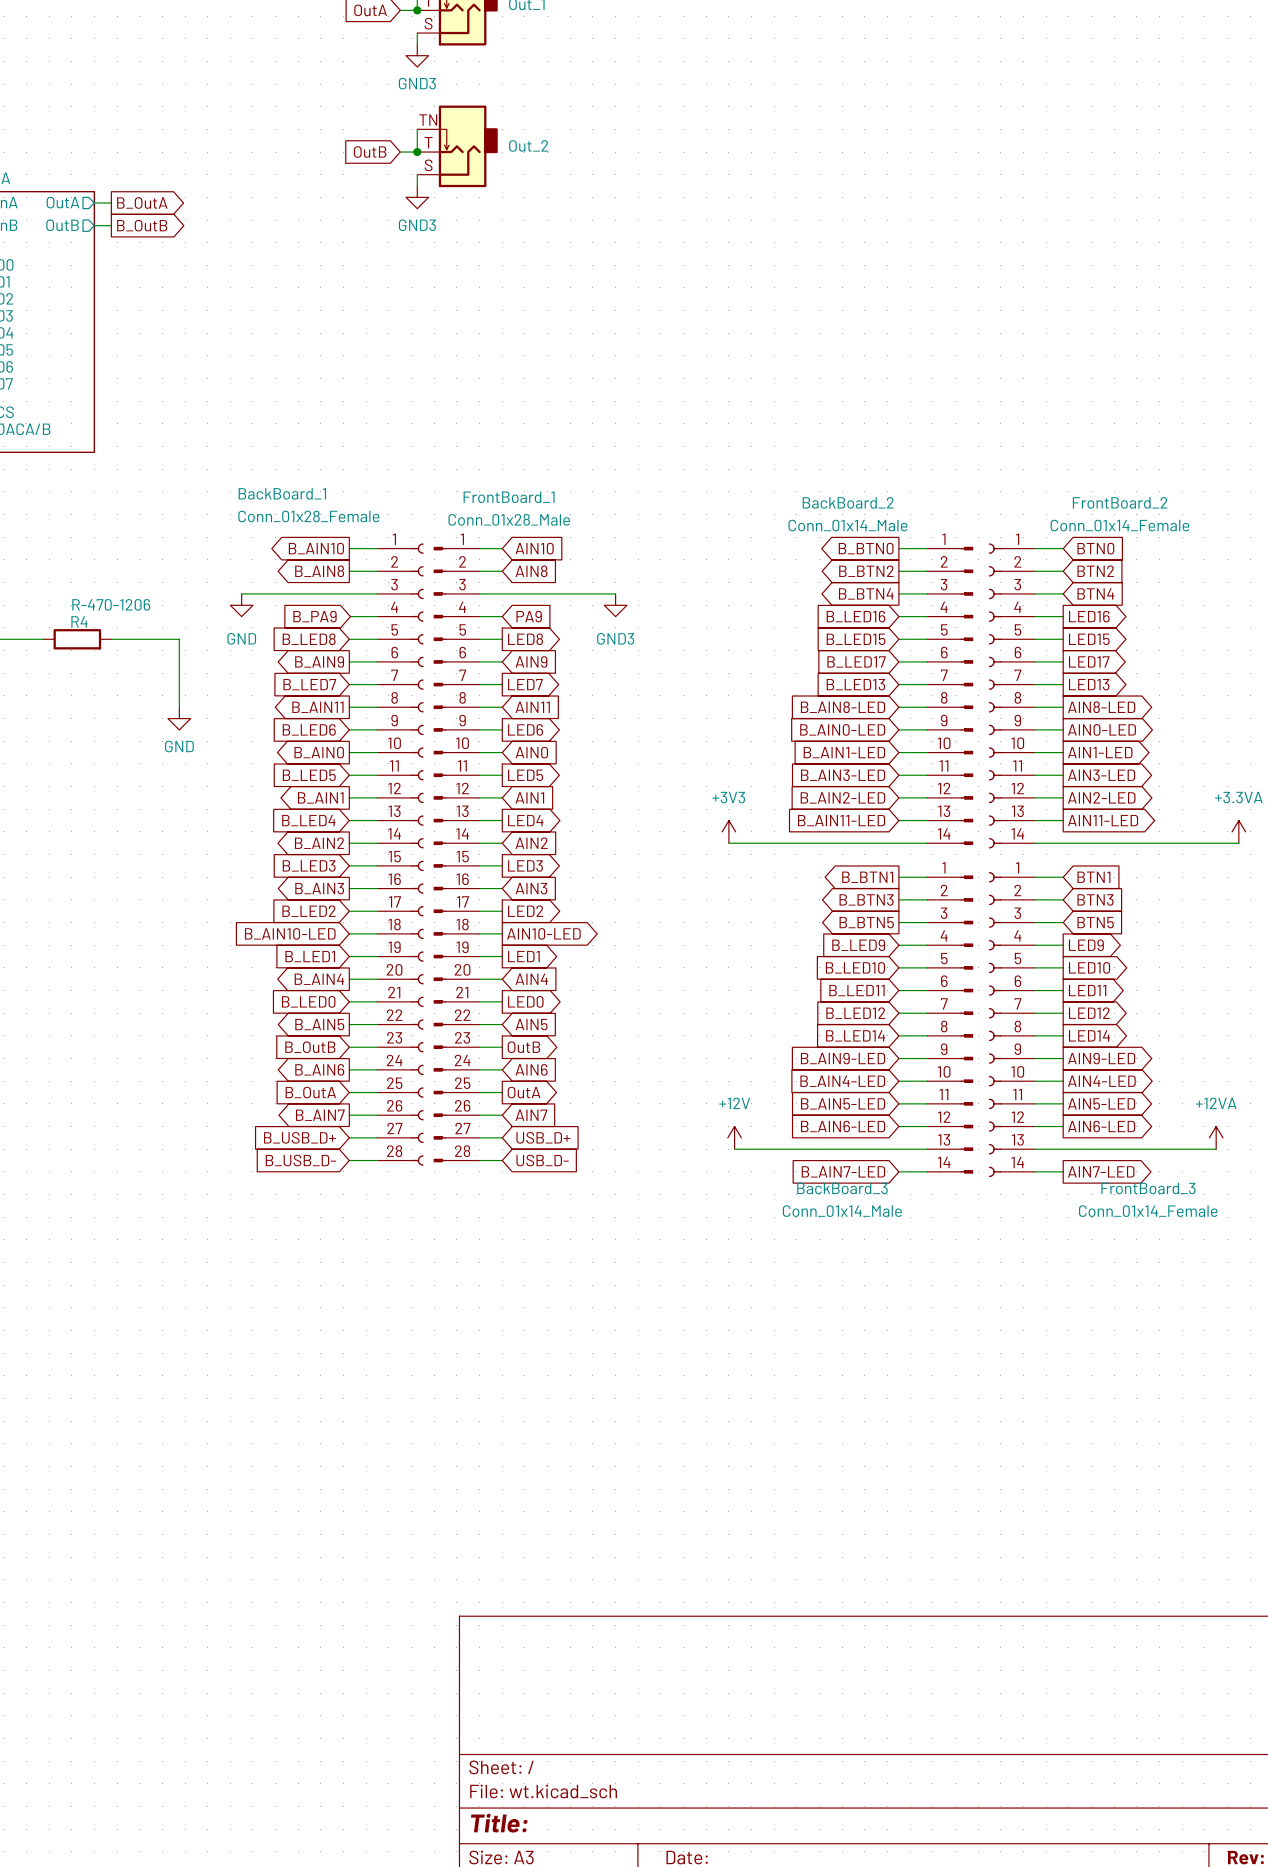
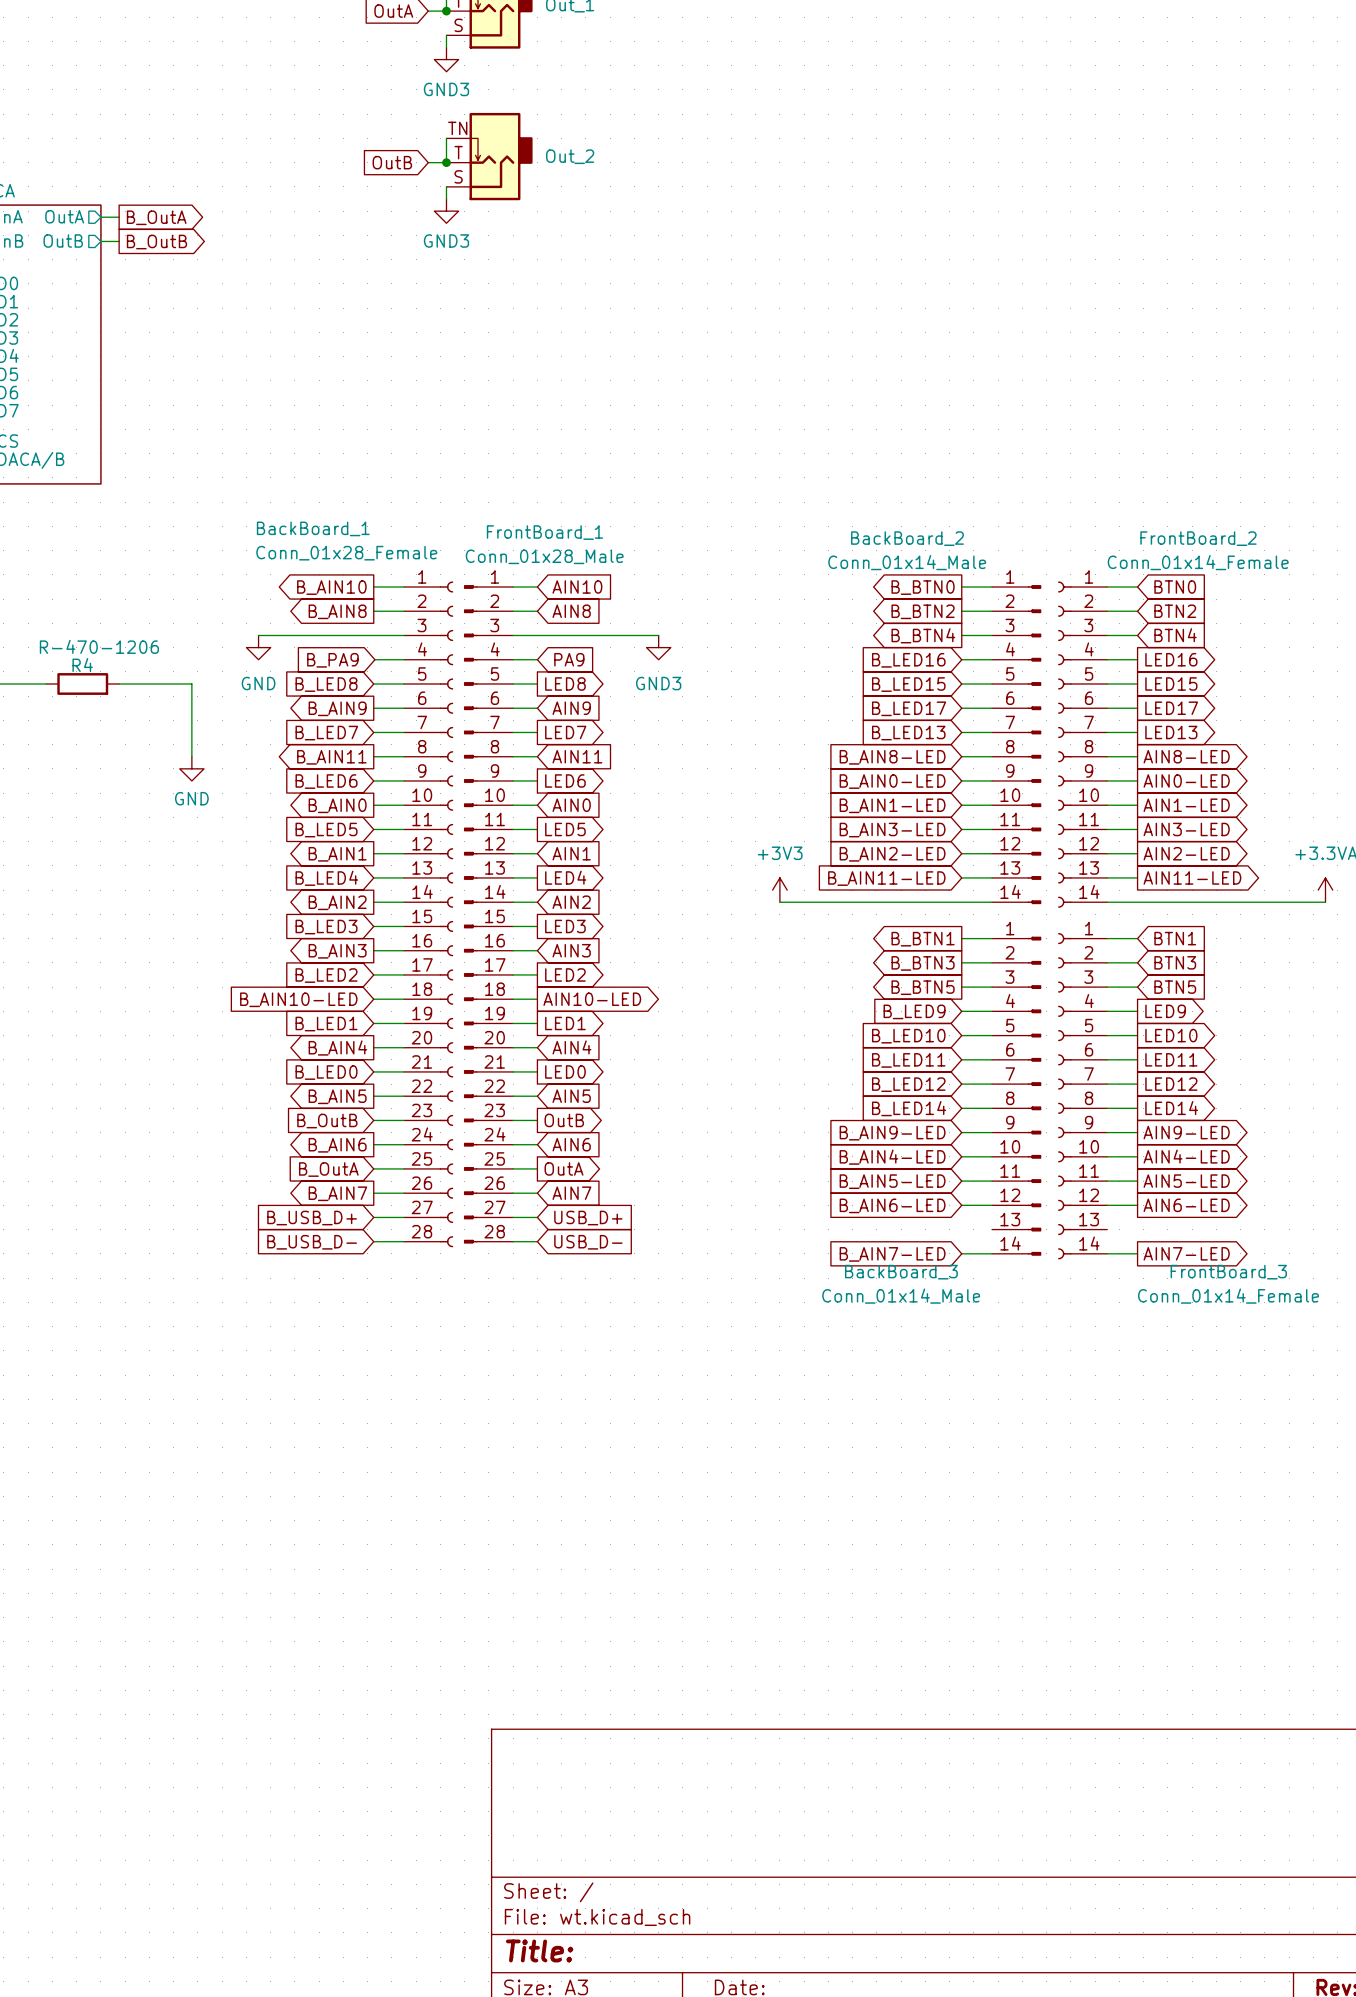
power symbol: +12V (734, 1137) -> none
power symbol: +12VA (1216, 1137) -> none
wire: (734, 1149) (927, 1149) -> none
wire: (1034, 1149) (1216, 1149) -> none

